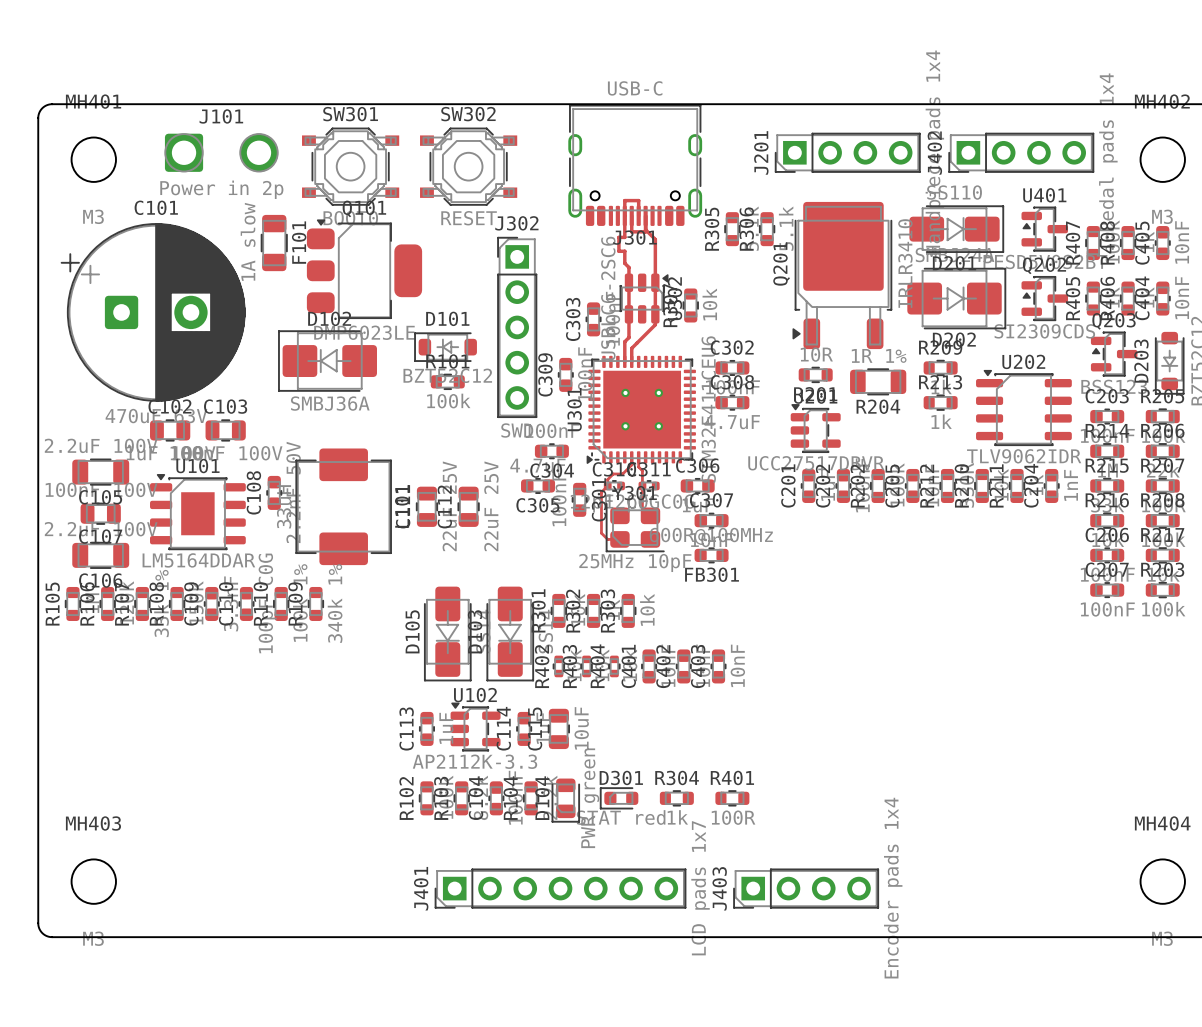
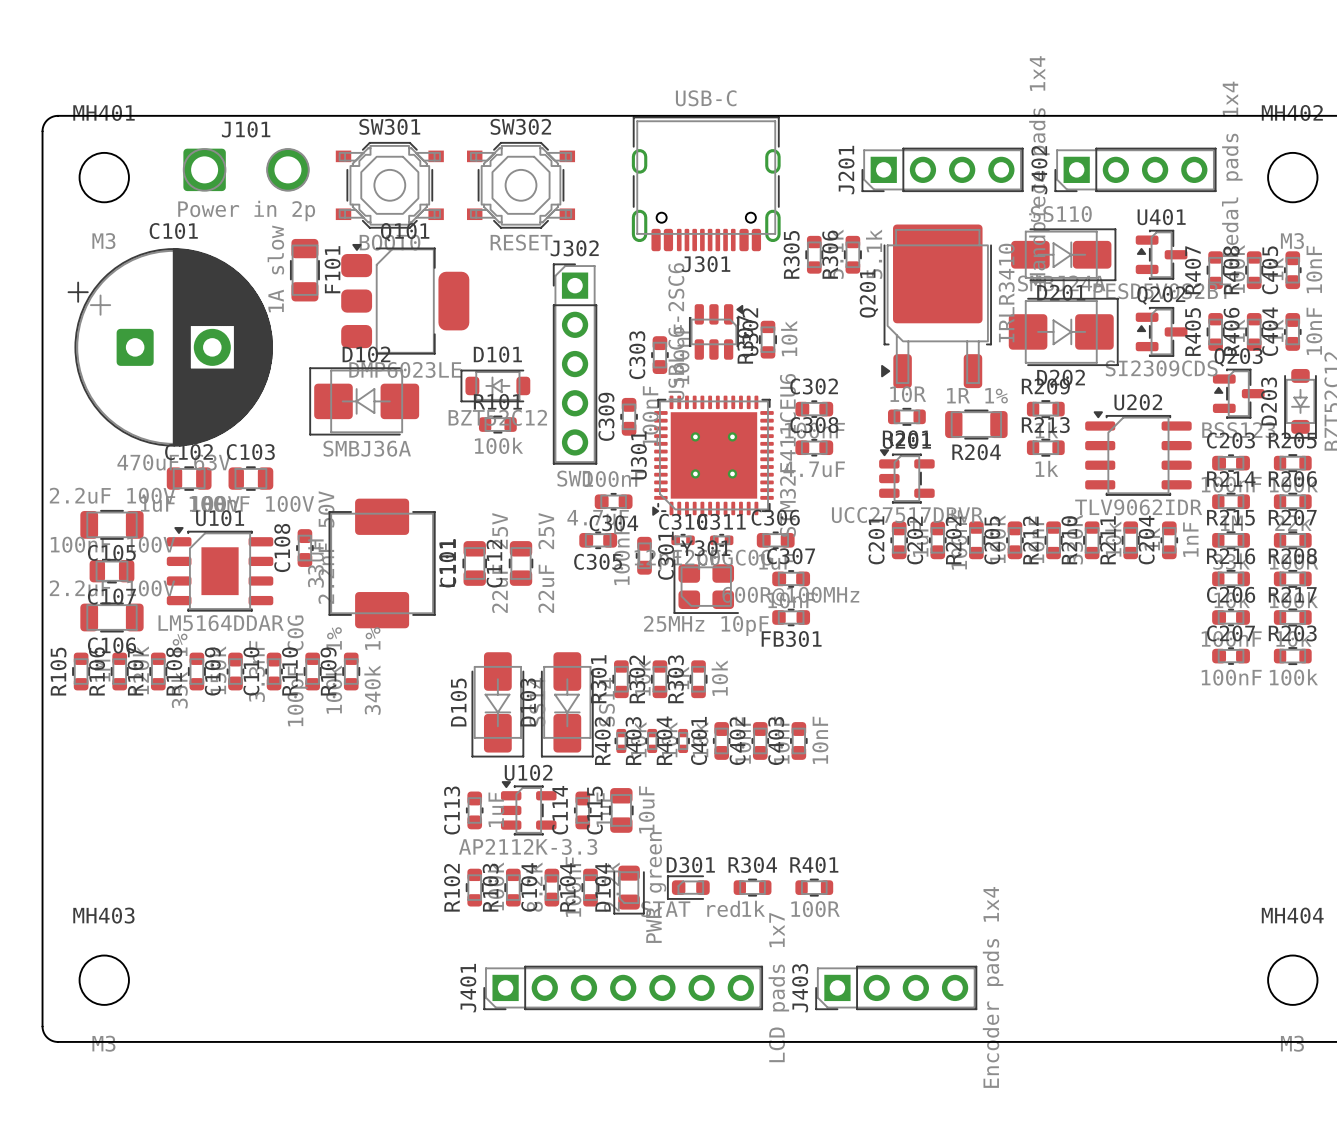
track: (631, 215) (631, 231) (645, 231) (645, 215) -> none
track: (638, 215) (638, 200) (624, 200) (624, 237) (618, 237) (618, 251) (624, 251) (624, 263) (628, 267) (628, 337) (624, 341) (624, 361) -> none
track: (645, 229) (655, 239) (655, 324) (631, 348) (631, 361) -> none
track: (631, 457) (631, 464) (622, 474) (613, 474) (607, 479) (607, 485) (601, 492) (601, 533) (607, 539) (619, 539) -> none
track: (638, 457) (638, 467) (642, 470) (642, 515) (650, 515) -> none

